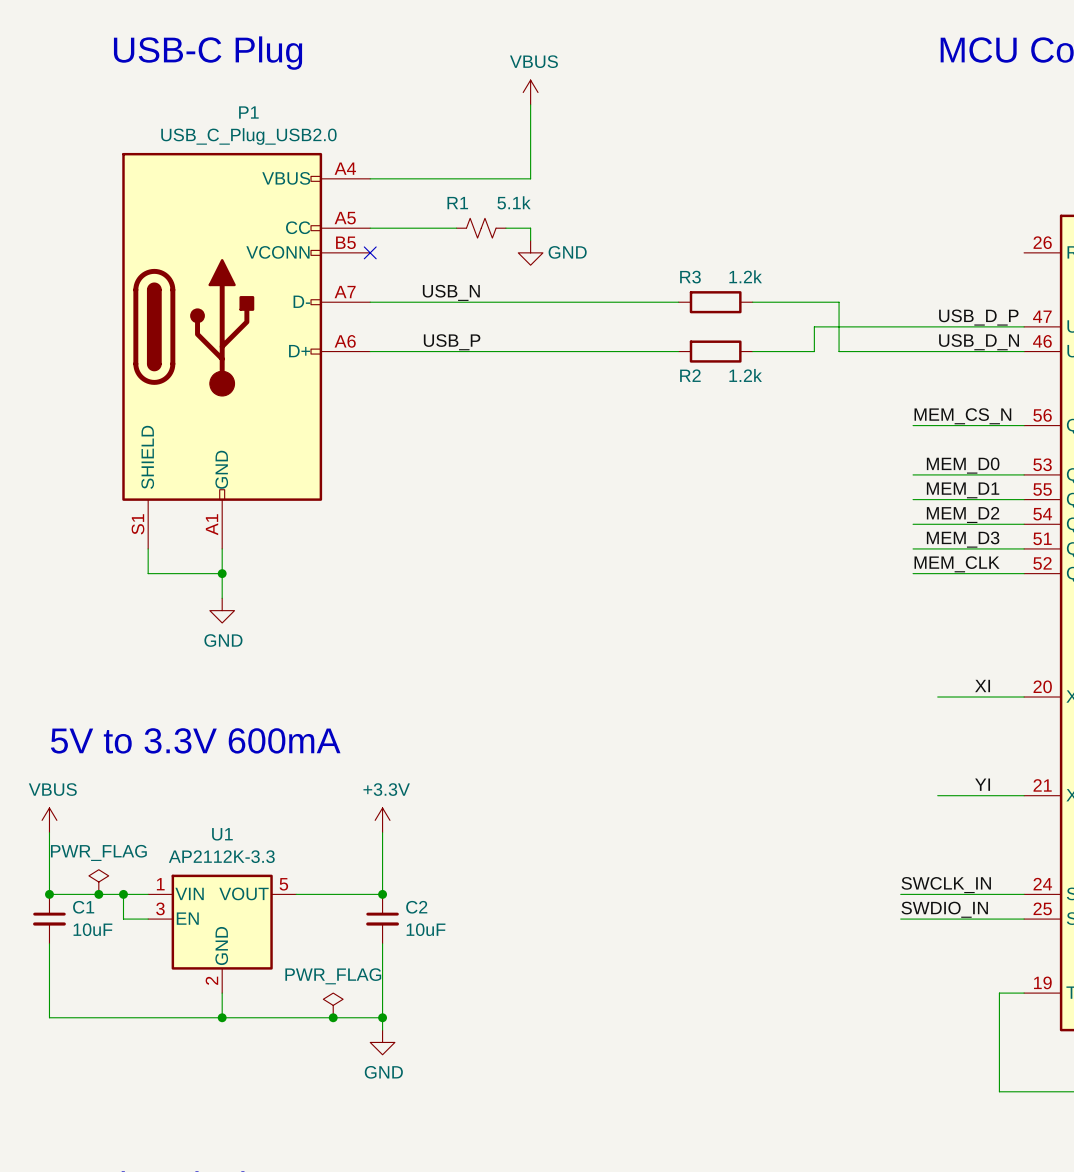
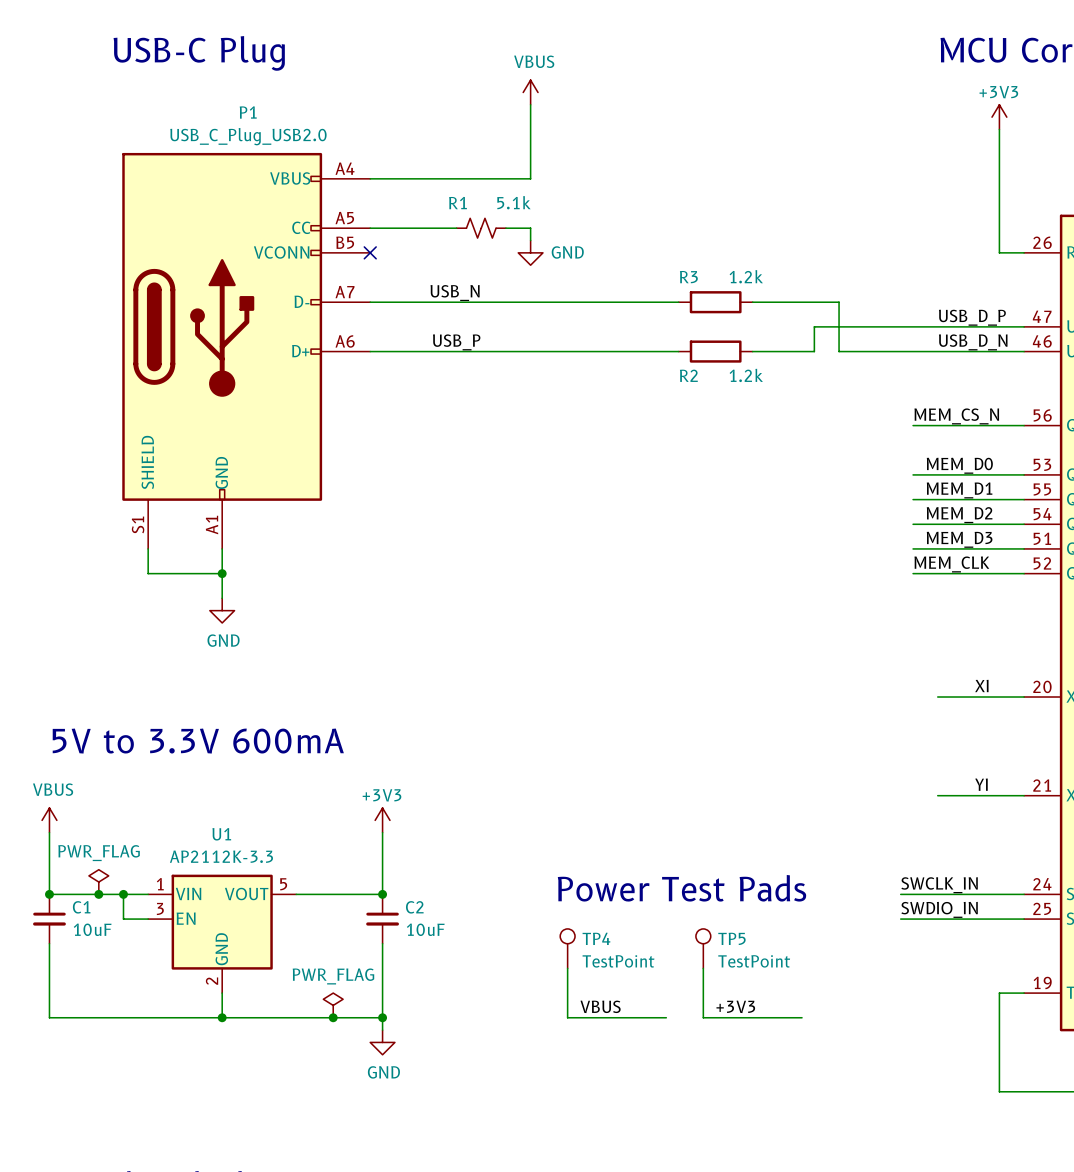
power symbol: none -> +3V3 (999, 117)
wire: none -> (999, 129) (999, 252) (1024, 252)
power symbol: +3.3V (382, 820) -> +3V3 (382, 820)
text: none -> Power Test Pads (681, 888)
TP4: none -> TestPoint (567, 948)
TP5: none -> TestPoint (703, 948)
wire: none -> (567, 968) (567, 1017) (666, 1017)
wire: none -> (703, 968) (703, 1017) (802, 1017)
label: none -> VBUS (600, 1006)
label: none -> +3V3 (735, 1006)

